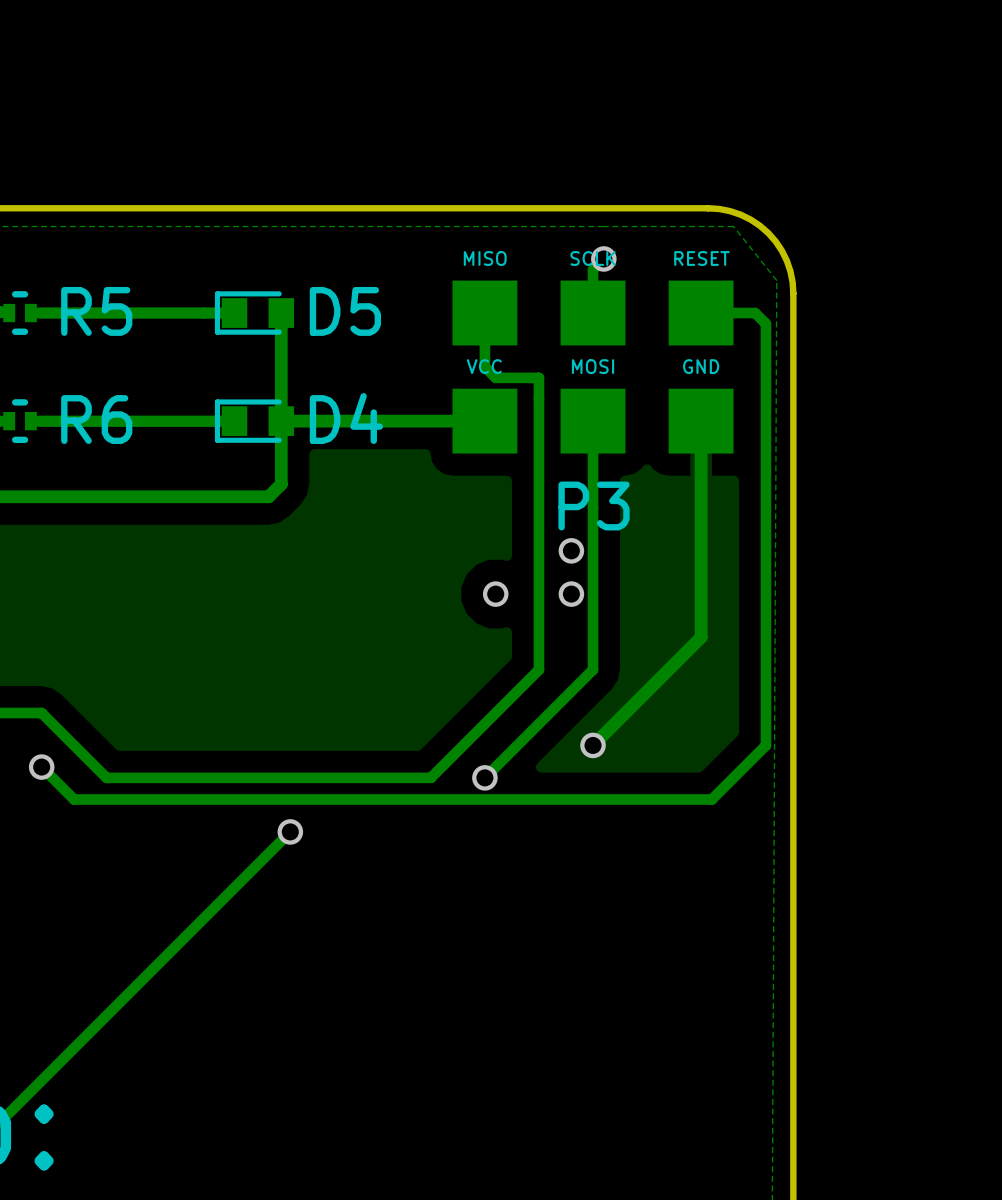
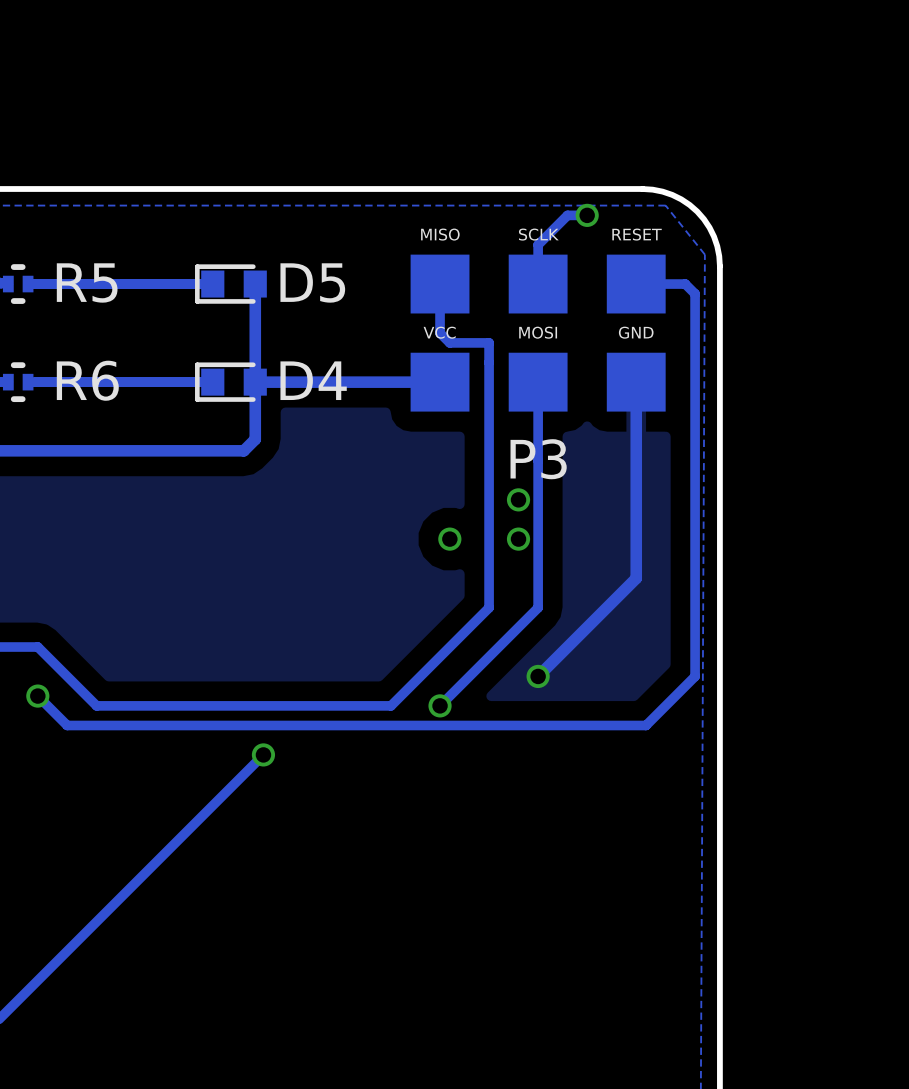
track: none -> (587, 215) (567, 215) (547, 235)
via position: (603, 258) -> (587, 215)

